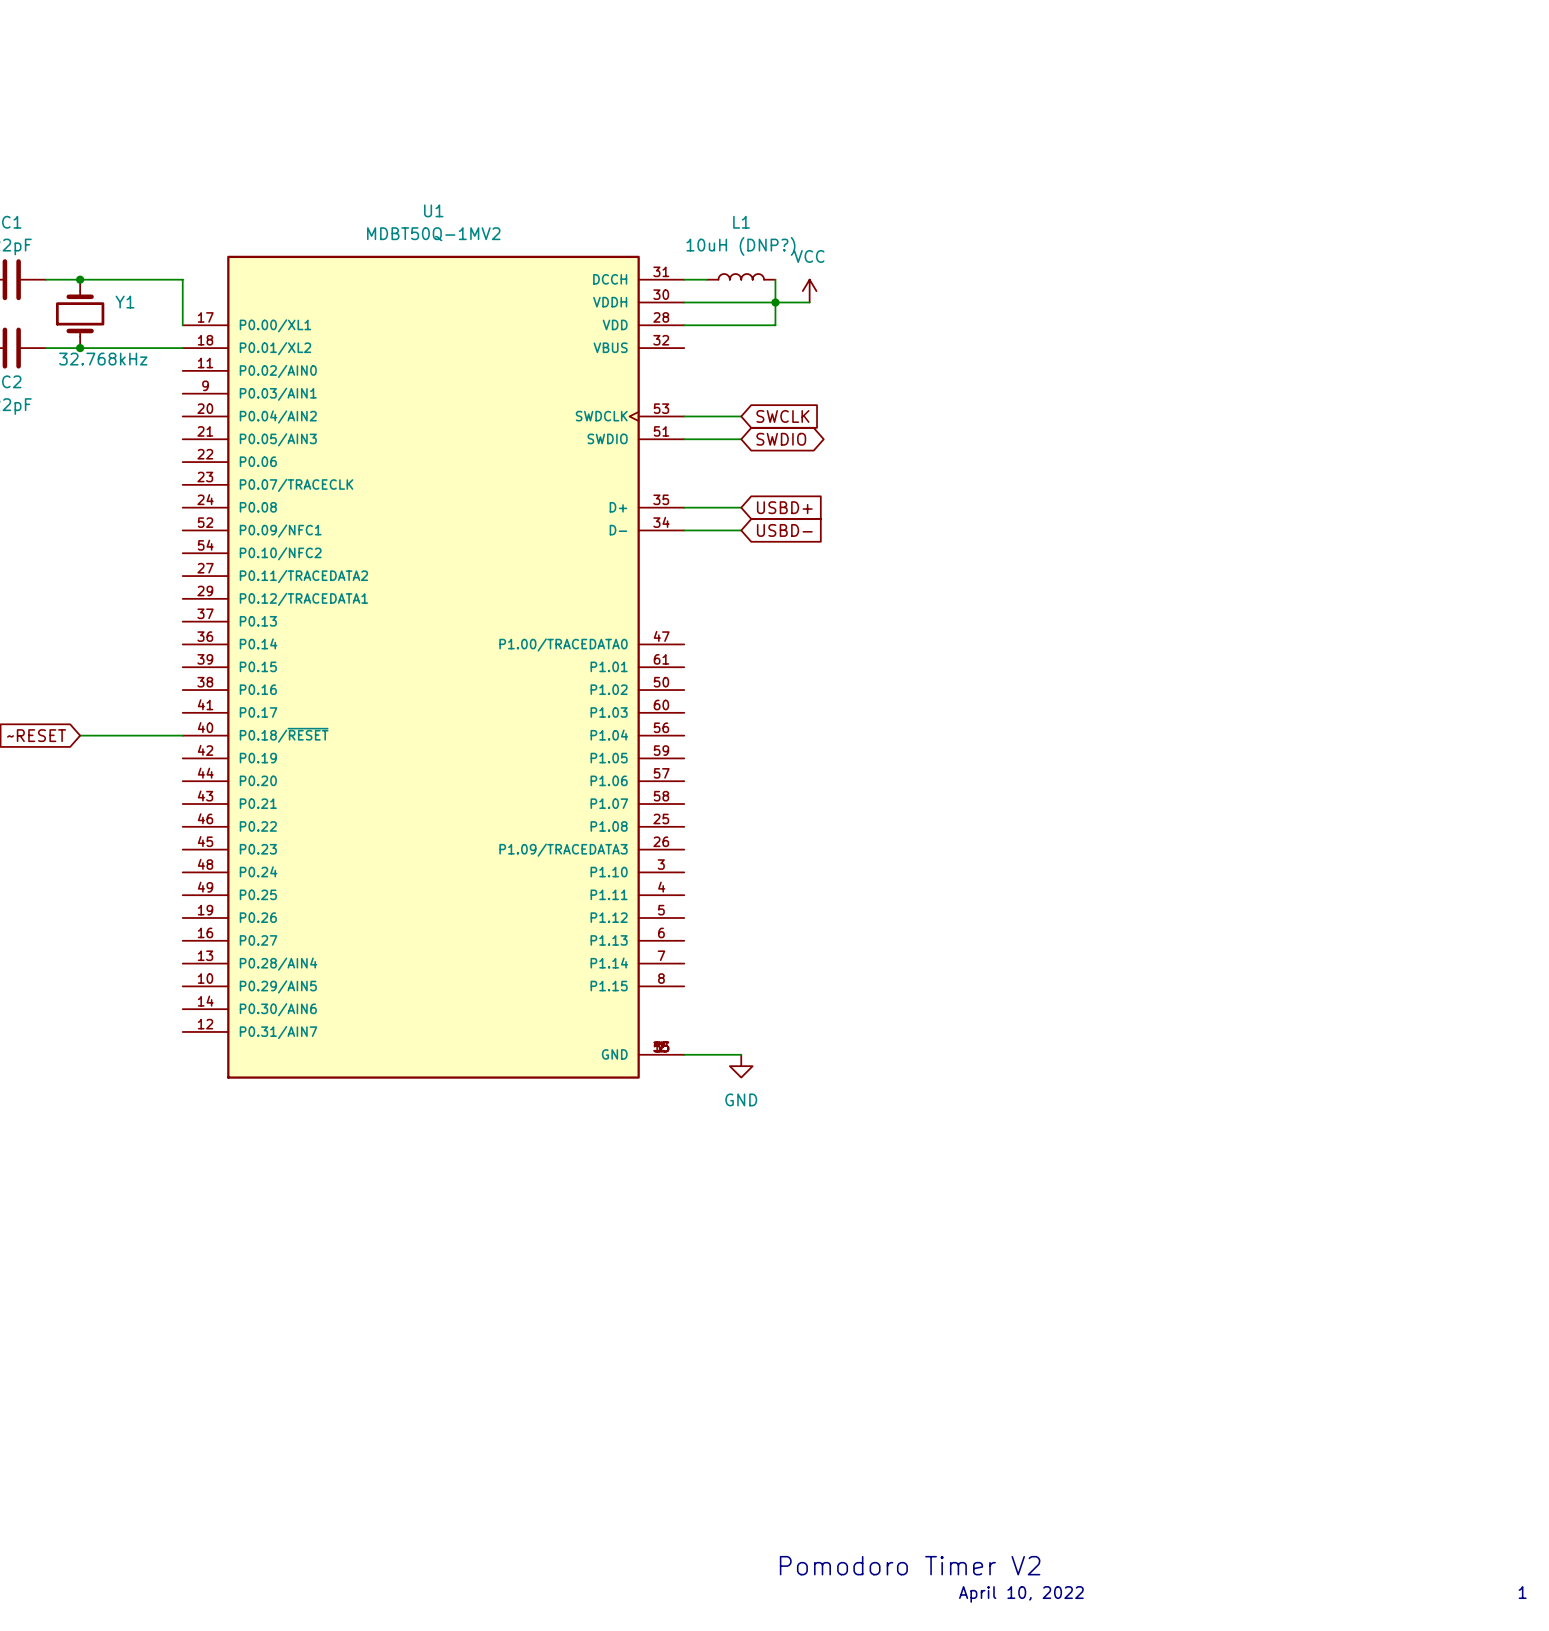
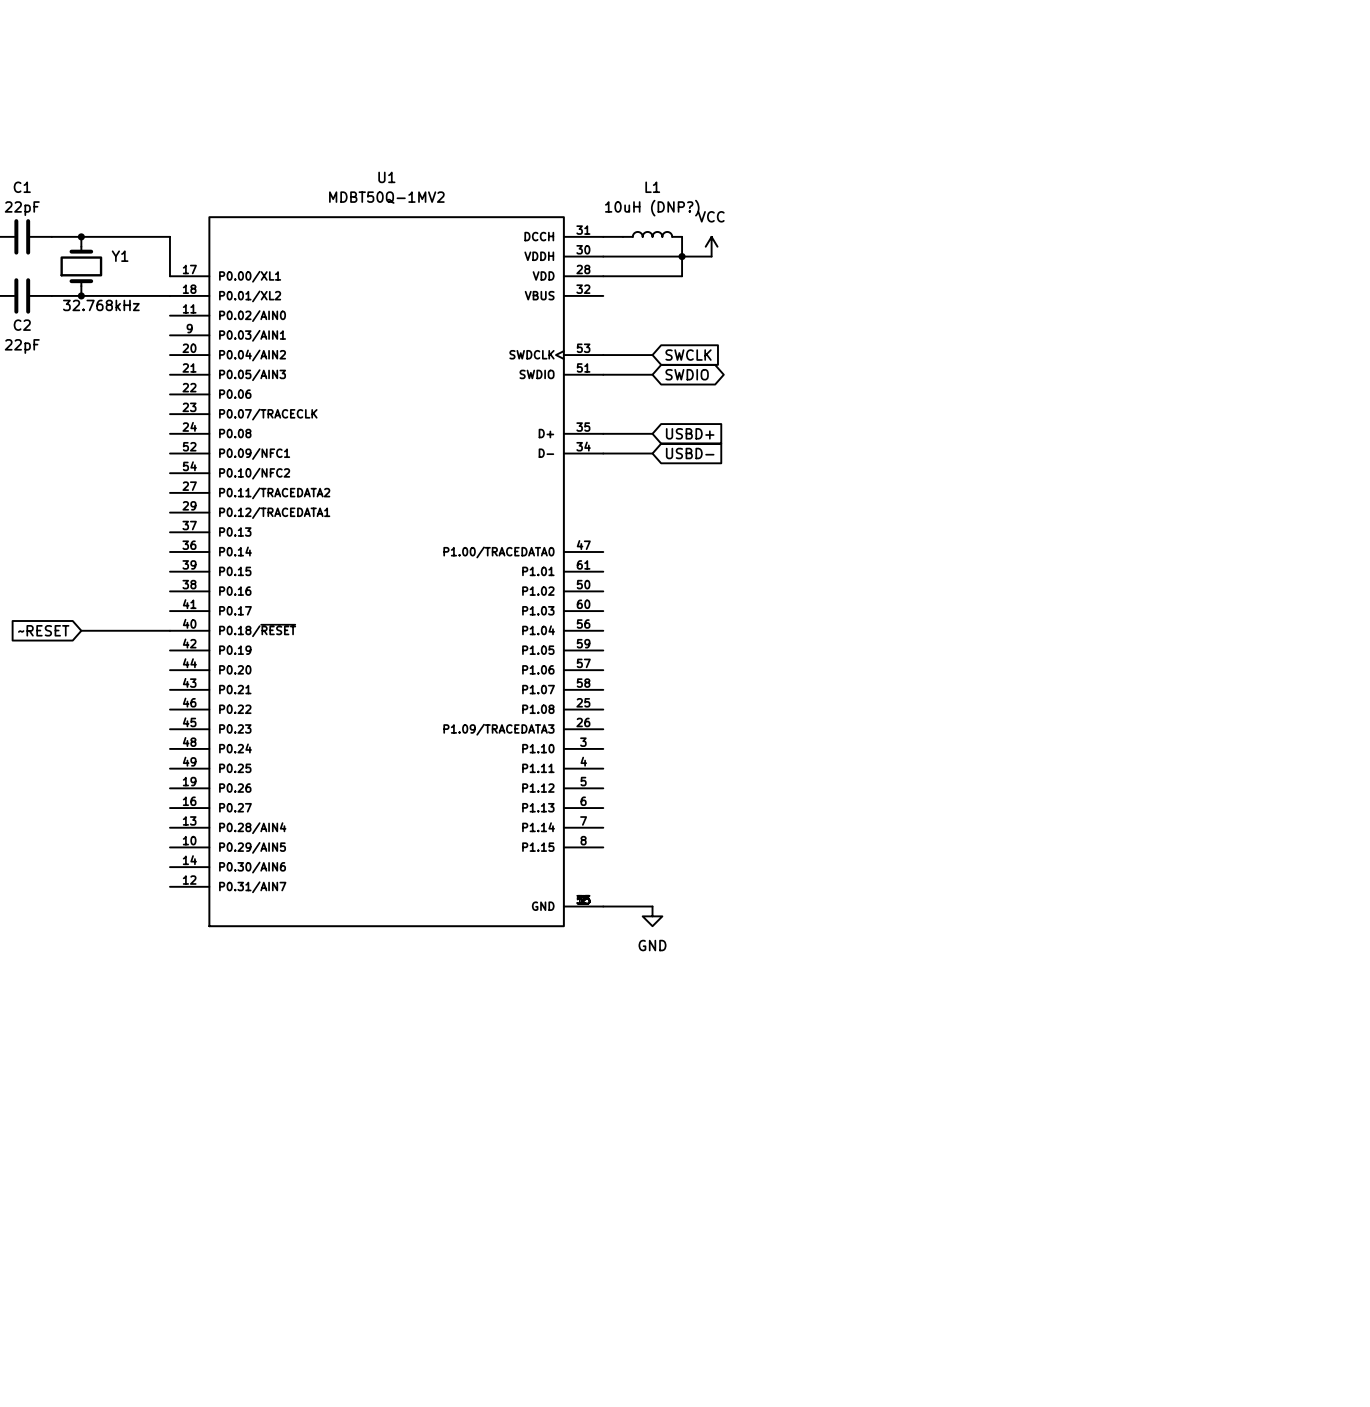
text: Pomodoro Timer V2 (910, 1565) -> none
text: 1 (1522, 1592) -> none
text: April 10, 2022 (1021, 1594) -> none

